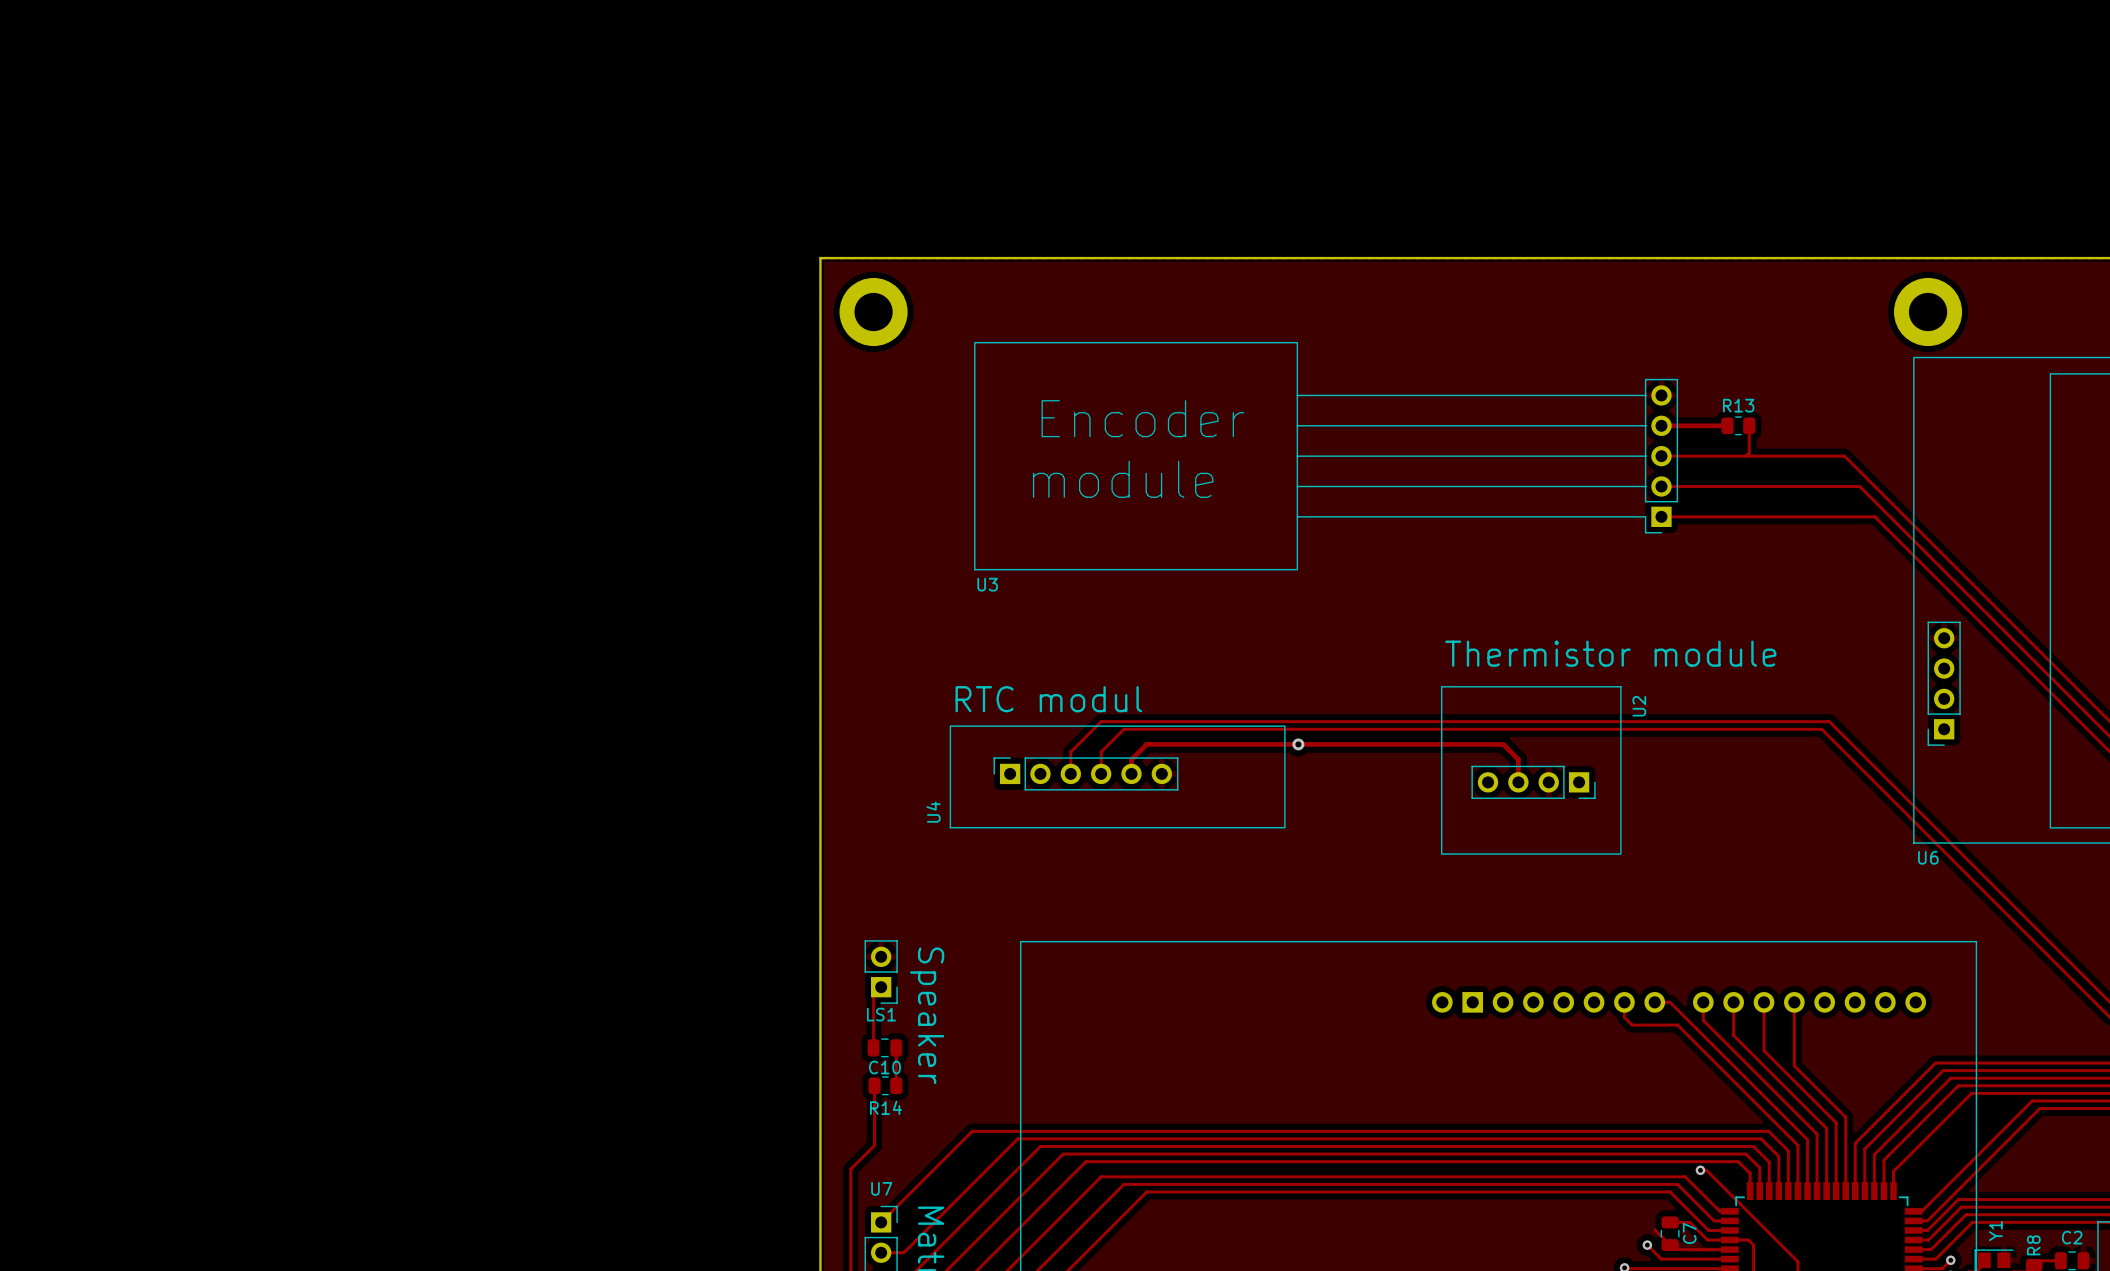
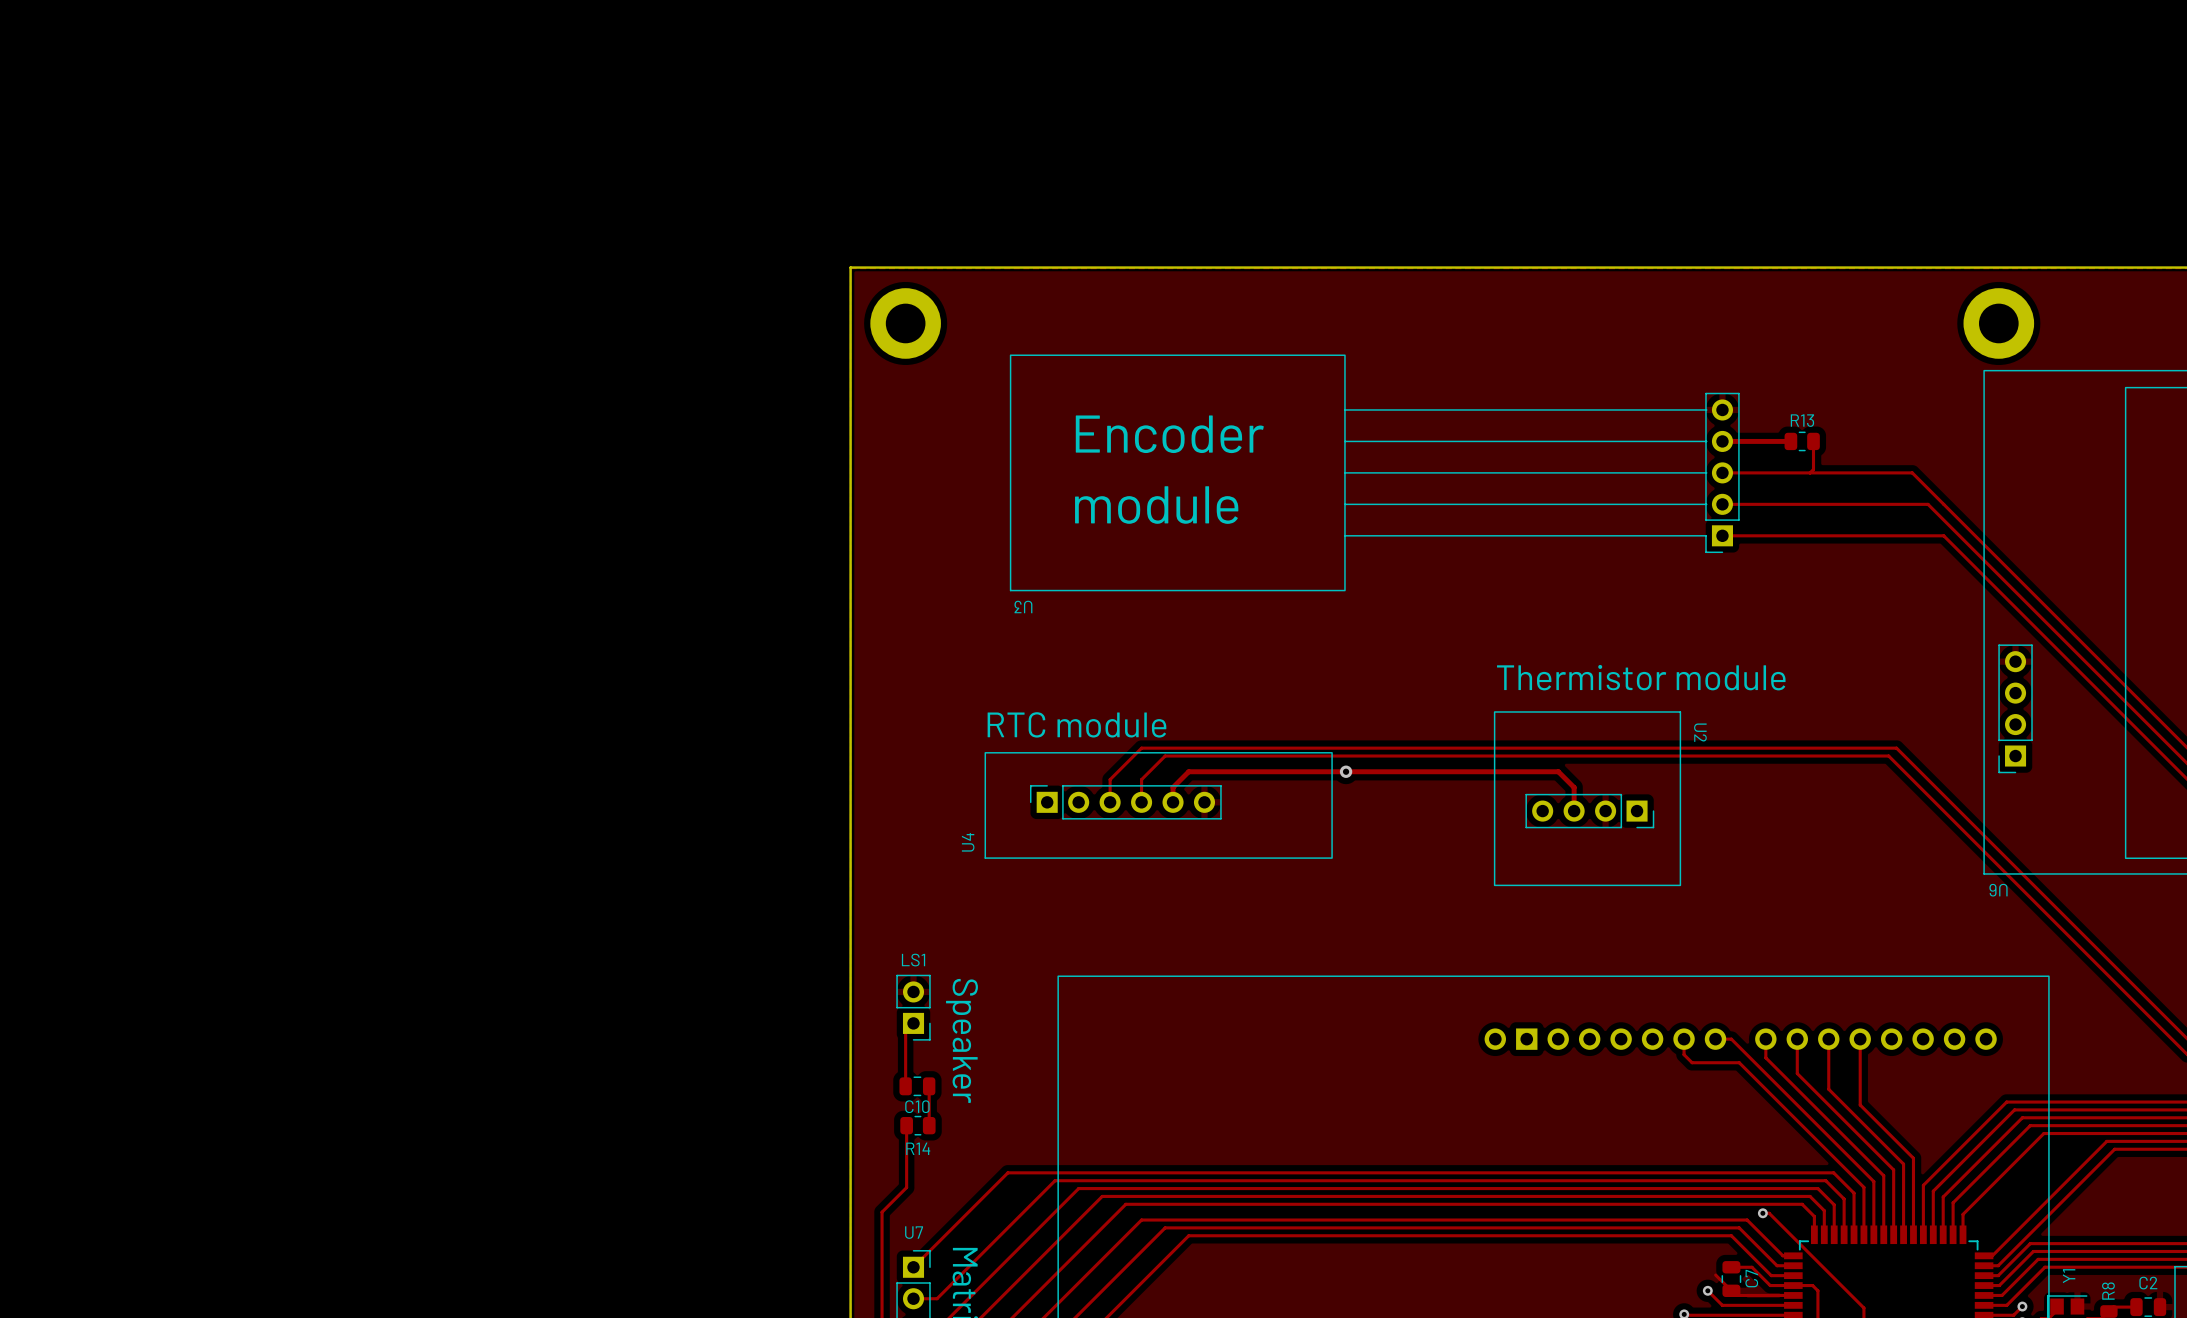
U3 footprint: [974, 342, 1679, 571] -> [1009, 354, 1740, 592]
text: RTC modul (1048, 699) -> RTC module (1076, 724)
U2 name rotation: 0° (1639, 706) -> 180° (1700, 732)
U6 name rotation: 0° (1928, 857) -> 180° (1998, 890)
LS1 name position: LS1 (881, 1014) -> LS1 (913, 960)

